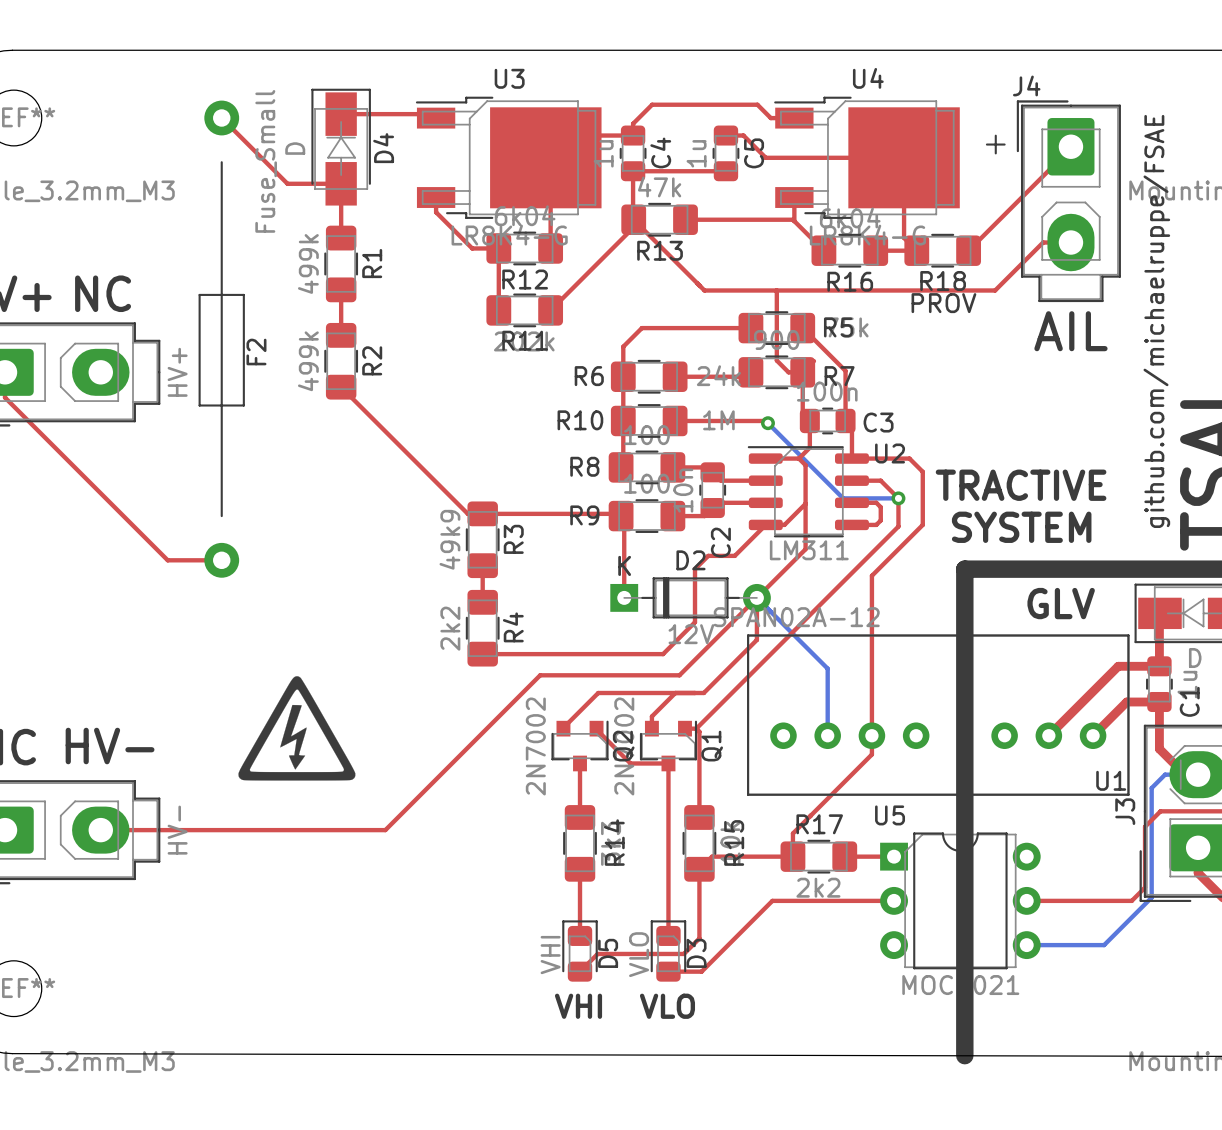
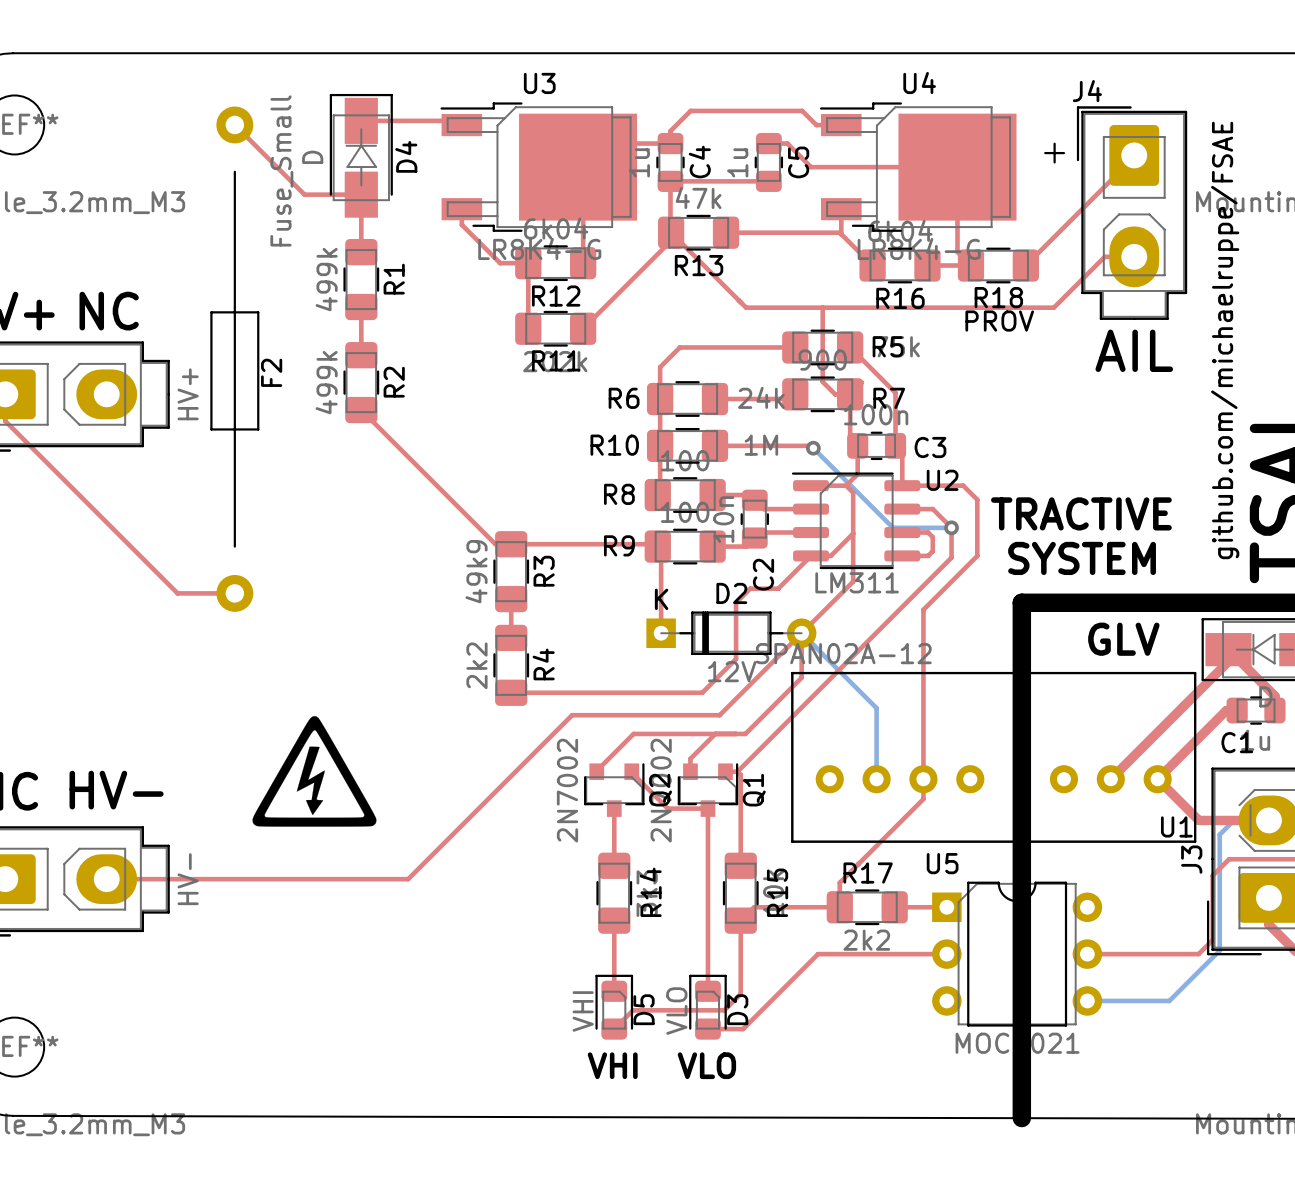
top track: (1159, 613) (1159, 666) (1118, 666) -> (1274, 710) (1274, 696) (1228, 649) (1228, 661) (1184, 705)
C1 rotation: 0° (1159, 684) -> 90° clockwise (1256, 710)
top track: (1126, 702) (1159, 702) -> (1193, 743) (1226, 710) (1237, 710)
top track: (1159, 702) (1159, 748) (1191, 781) -> none
top track: none -> (1157, 779) (1198, 820) (1268, 820)

